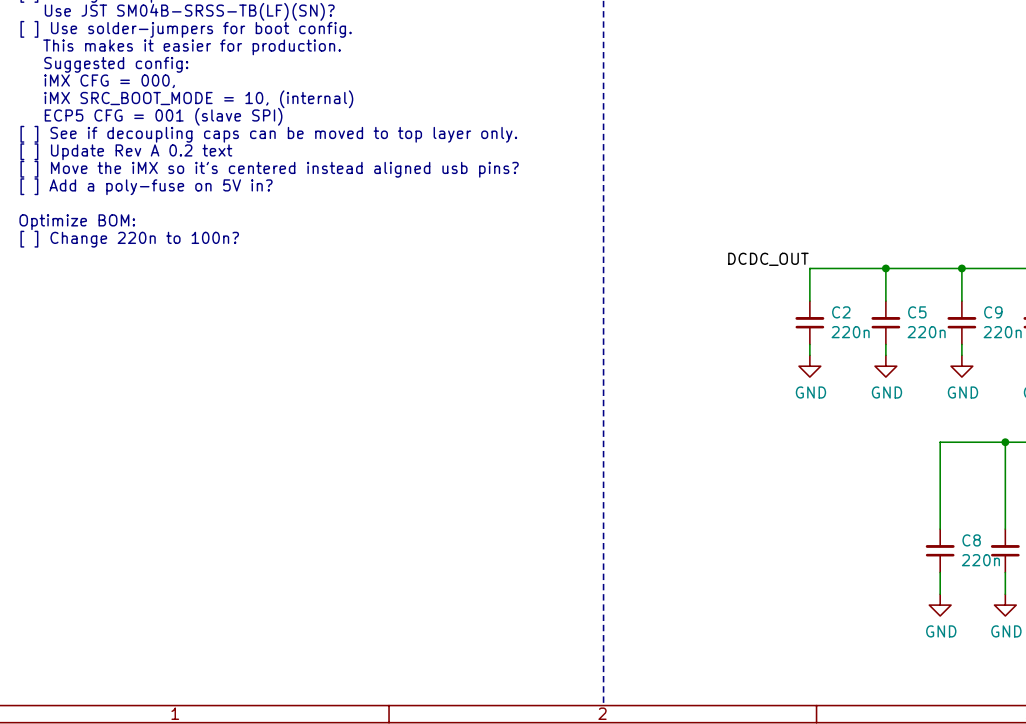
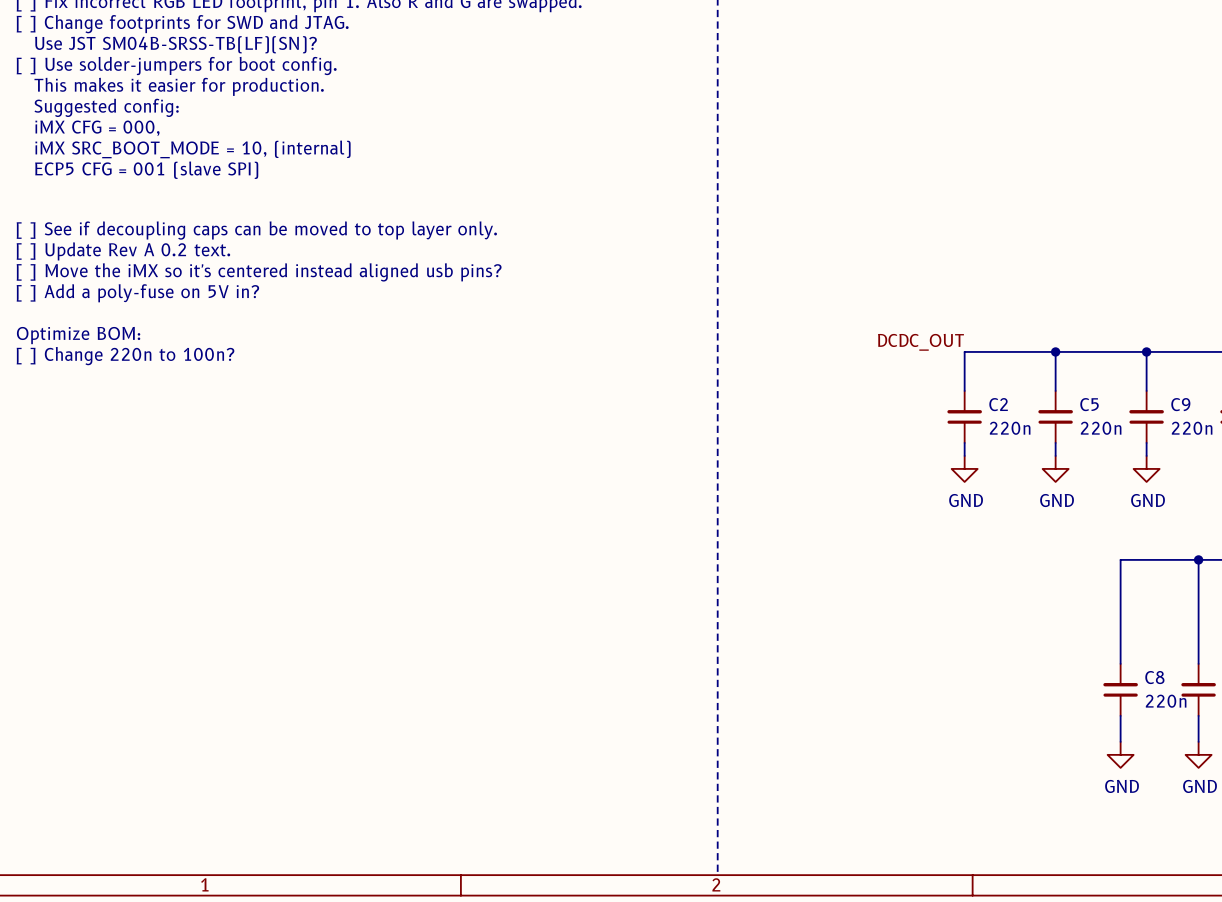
text position: [ ] See if decoupling caps can be moved to top layer only. (268, 134) -> [ ] See if decoupling caps can be moved to top layer only. (256, 230)
text: [ ] Update Rev A 0.2 text (126, 151) -> none
text position: [ ] Move the iMX so it's centered instead aligned usb pins? (269, 169) -> [ ] Move the iMX so it's centered instead aligned usb pins? (259, 272)
text: none -> [ ] Update Rev A 0.2 text. (123, 251)
text position: [ ] Add a poly-fuse on 5V in? (146, 186) -> [ ] Add a poly-fuse on 5V in? (137, 293)
text position: Optimize BOM: (77, 222) -> Optimize BOM: (78, 335)
text position: [ ] Change 220n to 100n? (129, 239) -> [ ] Change 220n to 100n? (125, 356)

